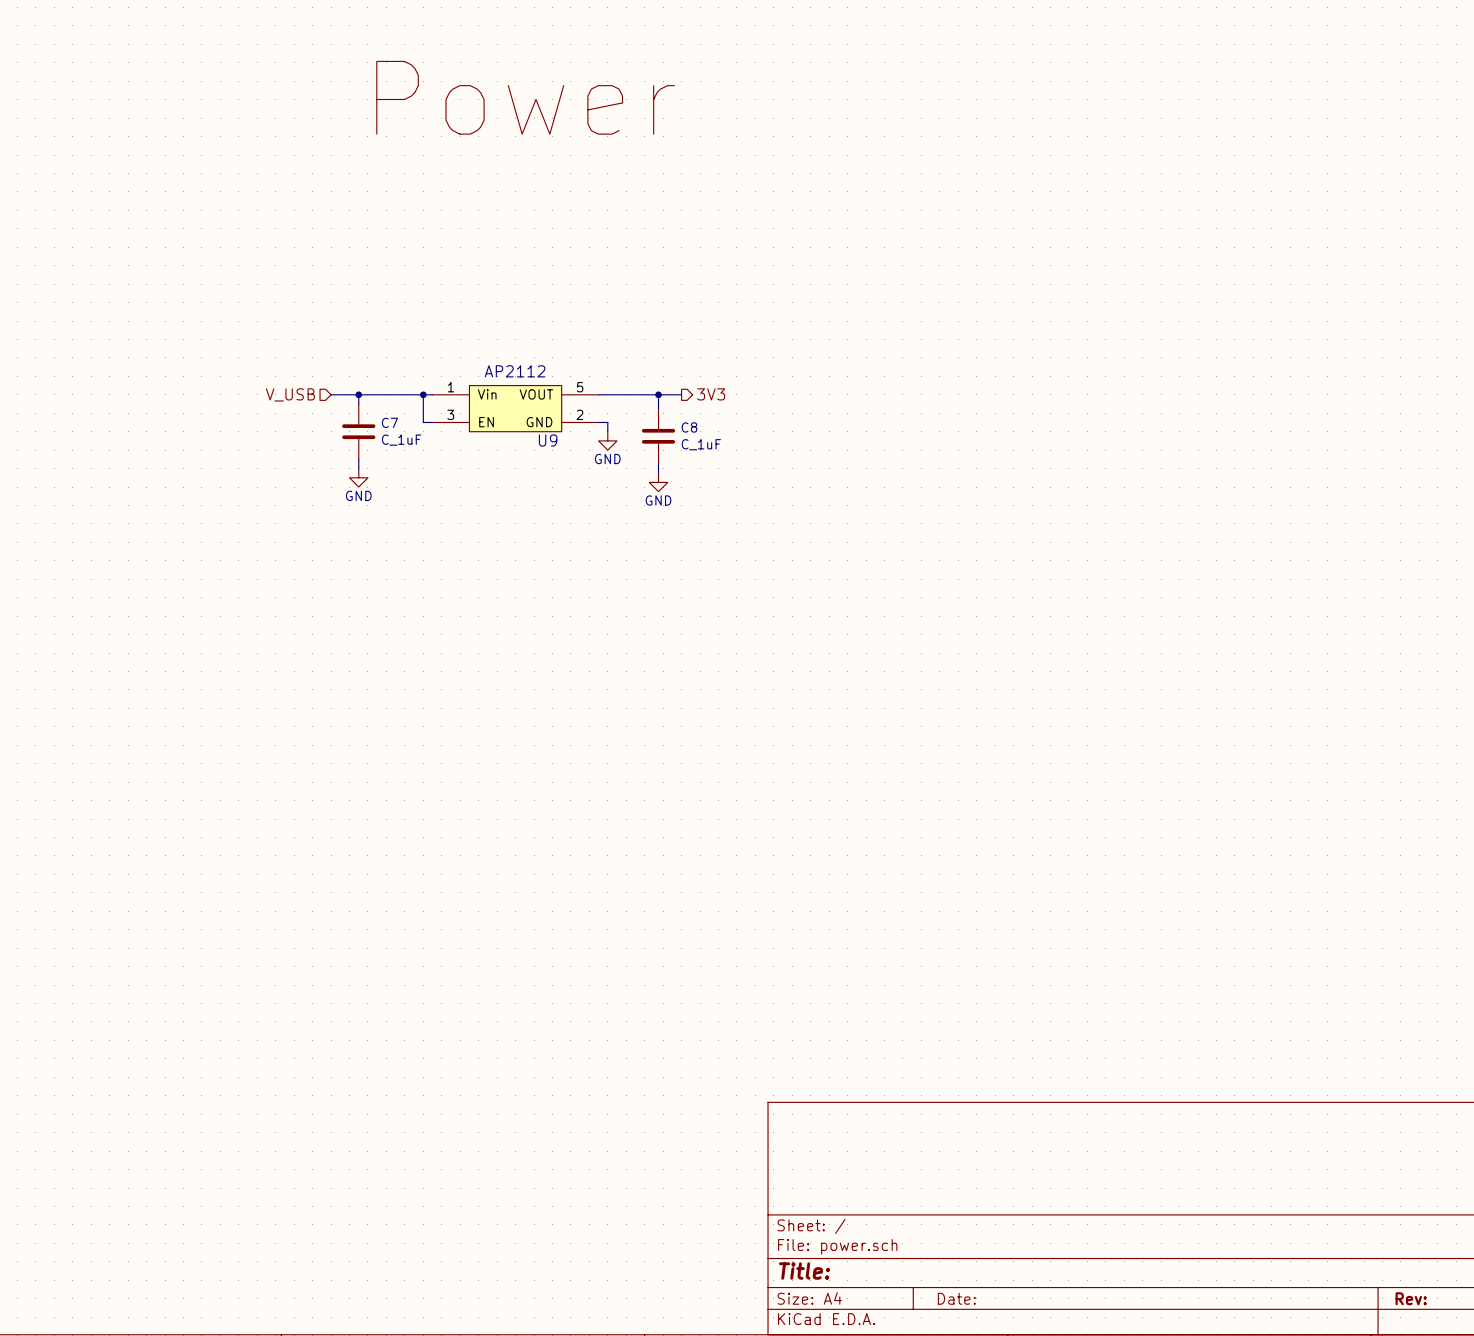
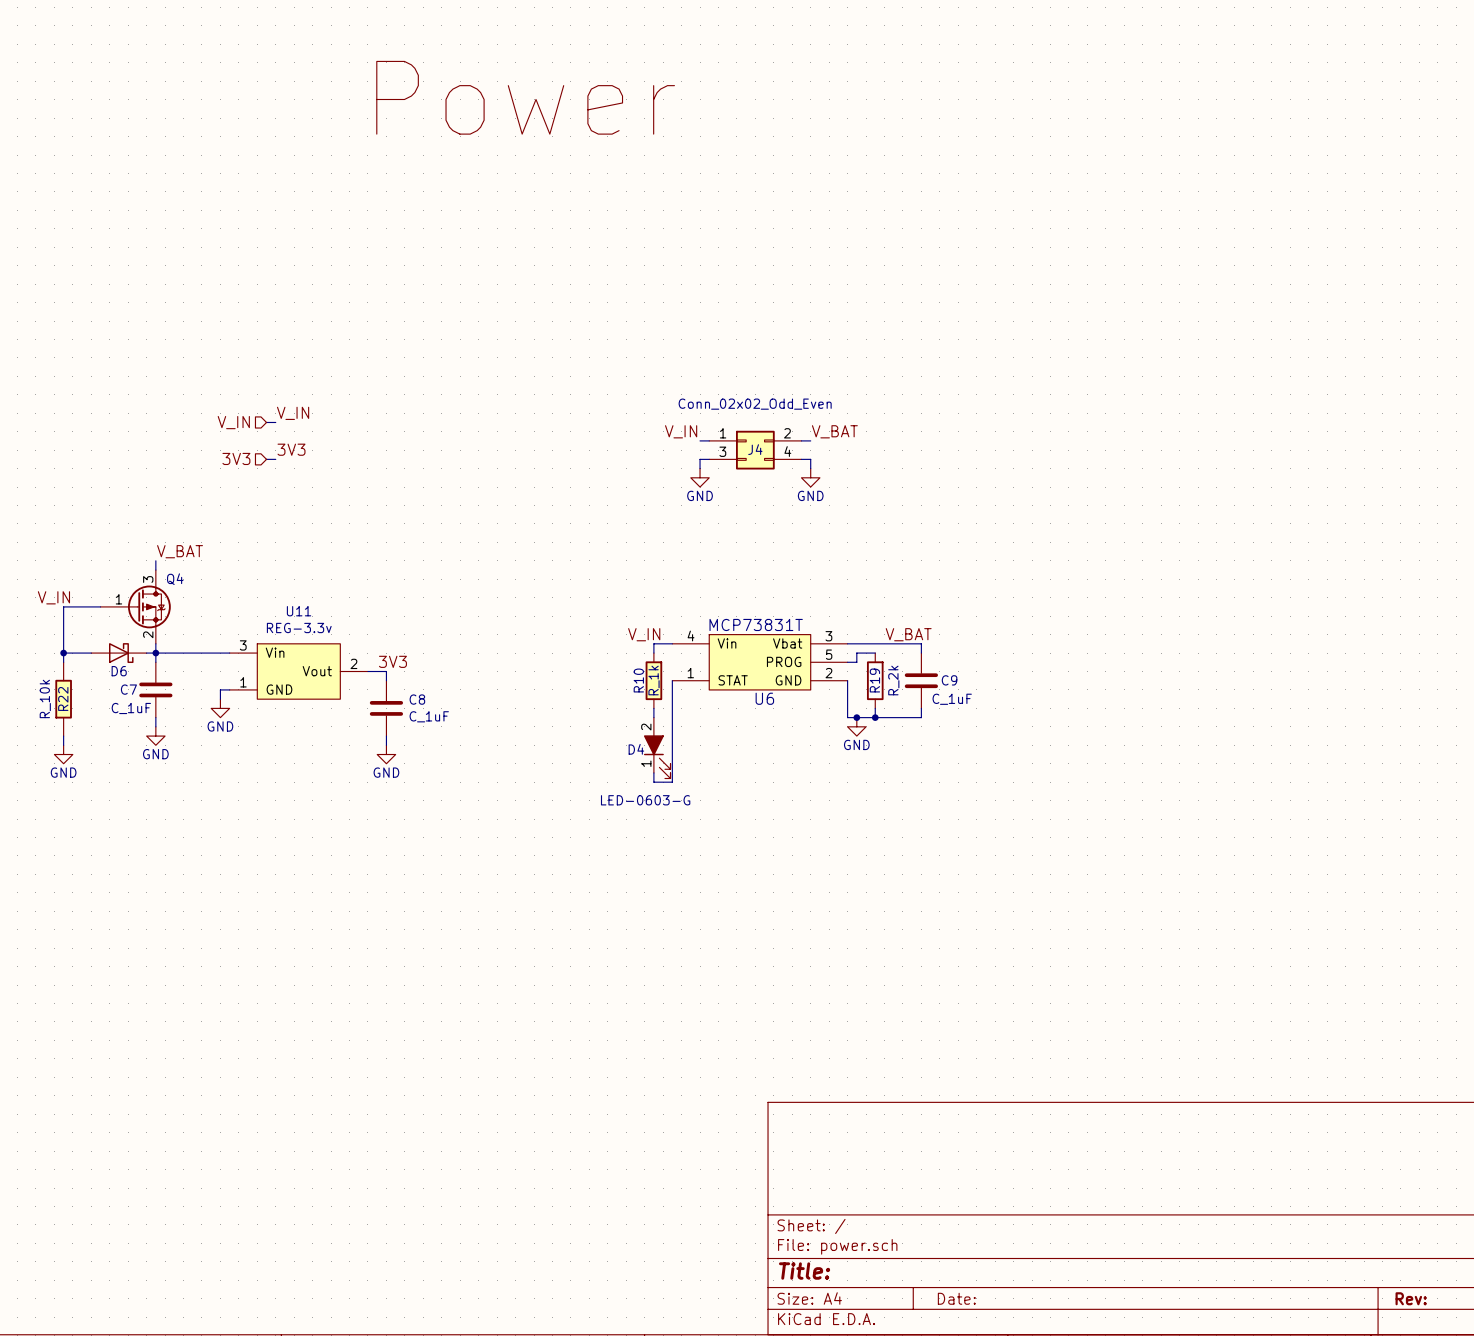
hierarchical label: V_USB (290, 394) -> none
wire: (331, 394) (432, 394) -> none
wire: (358, 394) (358, 404) -> none
junction: (358, 394) -> none
wire: (423, 394) (423, 422) (432, 422) -> none
junction: (423, 394) -> none
wire: (598, 394) (681, 394) -> none
wire: (658, 394) (658, 408) -> none
junction: (658, 394) -> none
hierarchical label: 3V3 (711, 394) -> none
U9: AP2112 (515, 408) -> none
label: none -> V_IN (293, 413)
hierarchical label: none -> V_IN (233, 422)
wire: none -> (266, 422) (275, 422)
C7 name position: C7 (389, 422) -> C7 (128, 689)
wire: (598, 422) (607, 422) (607, 431) -> none
C7 position: (358, 431) -> (155, 689)
label: none -> V_IN (681, 431)
label: none -> V_BAT (834, 431)
C8 position: (658, 436) -> (386, 708)
C7 value position: C_1uF (401, 440) -> C_1uF (131, 708)
power symbol: GND (607, 440) -> none
wire: none -> (700, 440) (709, 440)
wire: none -> (801, 440) (810, 440)
label: none -> 3V3 (291, 449)
J4: none -> Conn_02x02_Odd_Even (755, 450)
hierarchical label: none -> 3V3 (236, 458)
wire: none -> (266, 459) (275, 459)
wire: (358, 459) (358, 468) -> none
wire: none -> (709, 459) (700, 459) (700, 468)
wire: none -> (801, 459) (810, 459) (810, 468)
wire: (658, 463) (658, 473) -> none
power symbol: GND (358, 477) -> none
power symbol: none -> GND (810, 477)
power symbol position: GND (658, 482) -> GND (700, 477)
label: none -> V_BAT (180, 551)
wire: none -> (155, 560) (155, 570)
label: none -> V_IN (53, 597)
wire: none -> (100, 606) (63, 606) (63, 662)
Q4: none -> (135, 606)
label: none -> V_IN (644, 634)
label: none -> V_BAT (908, 634)
wire: none -> (155, 643) (155, 662)
wire: none -> (672, 643) (653, 643) (653, 653)
wire: none -> (847, 643) (921, 643) (921, 653)
wire: none -> (63, 653) (91, 653)
junction: none -> (63, 653)
D6: none -> (118, 653)
wire: none -> (146, 653) (229, 653)
junction: none -> (155, 653)
wire: none -> (875, 653) (856, 653) (856, 662) (847, 662)
label: none -> 3V3 (392, 661)
U6: none -> MCP73831T (759, 662)
U11: none -> REG-3.3v (298, 671)
wire: none -> (367, 671) (386, 671) (386, 680)
R10: none -> R_1k (653, 680)
wire: none -> (672, 680) (672, 782) (653, 782) (653, 772)
wire: none -> (847, 680) (847, 717) (921, 717) (921, 708)
R19: none -> R_2k (875, 680)
C9: none -> C_1uF (921, 680)
wire: none -> (229, 689) (220, 689) (220, 699)
R22: none -> R_10k (63, 699)
power symbol: none -> GND (220, 708)
wire: none -> (653, 708) (653, 717)
wire: none -> (875, 708) (875, 717)
wire: none -> (155, 717) (155, 726)
junction: none -> (856, 717)
junction: none -> (875, 717)
power symbol: none -> GND (856, 726)
wire: none -> (63, 736) (63, 745)
power symbol: none -> GND (155, 736)
wire: none -> (386, 736) (386, 745)
D4: none -> LED-0603-G (657, 748)
power symbol: none -> GND (63, 754)
power symbol: none -> GND (386, 754)

